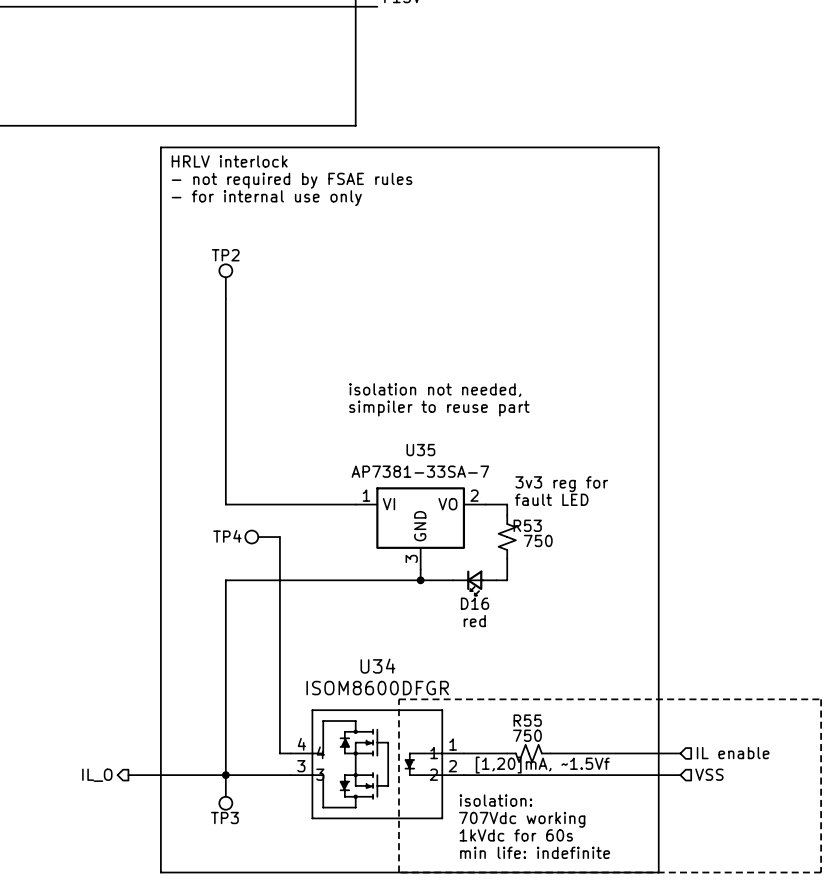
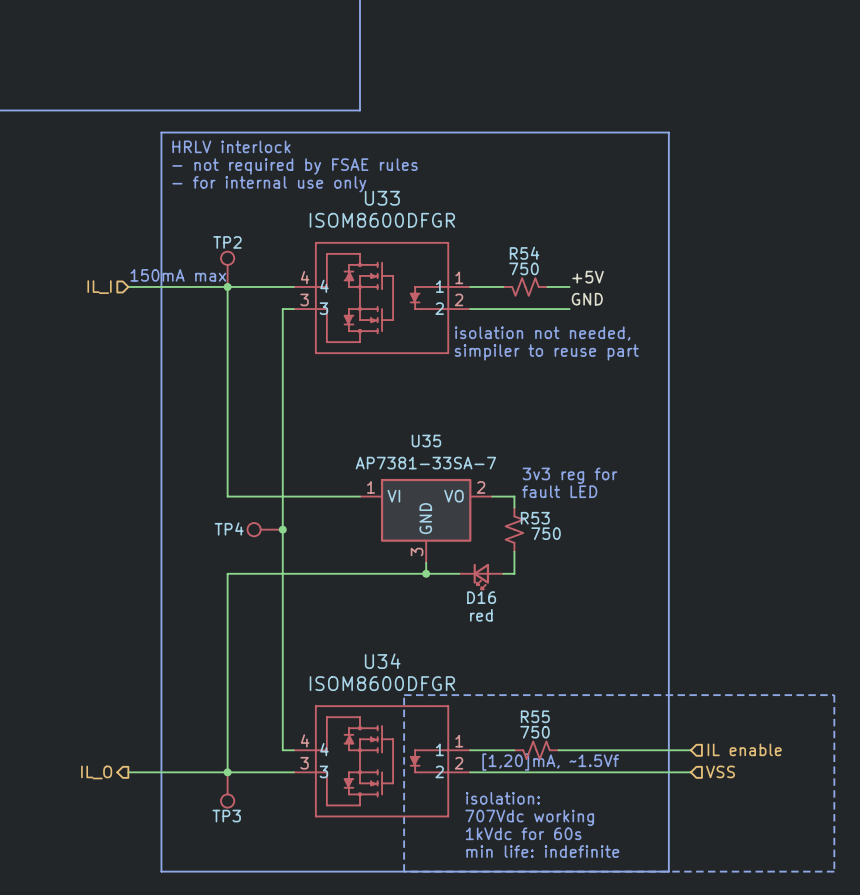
text: none -> 150mA max (178, 275)
label: none -> +5V (588, 277)
wire: none -> (128, 286) (293, 286)
junction: none -> (227, 286)
wire: none -> (470, 286) (503, 286)
R54: none -> 750 (525, 286)
wire: none -> (547, 286) (569, 286)
hierarchical label: none -> IL_I (99, 287)
U33: none -> ISOM8600DFGR (382, 298)
label: none -> GND (587, 299)
wire: none -> (293, 309) (282, 309) (282, 529)
wire: none -> (470, 309) (569, 309)
text position: isolation not needed, (435, 390) -> isolation not needed, (542, 333)
text position: simpiler to reuse part (439, 408) -> simpiler to reuse part (546, 352)
junction: none -> (282, 529)

